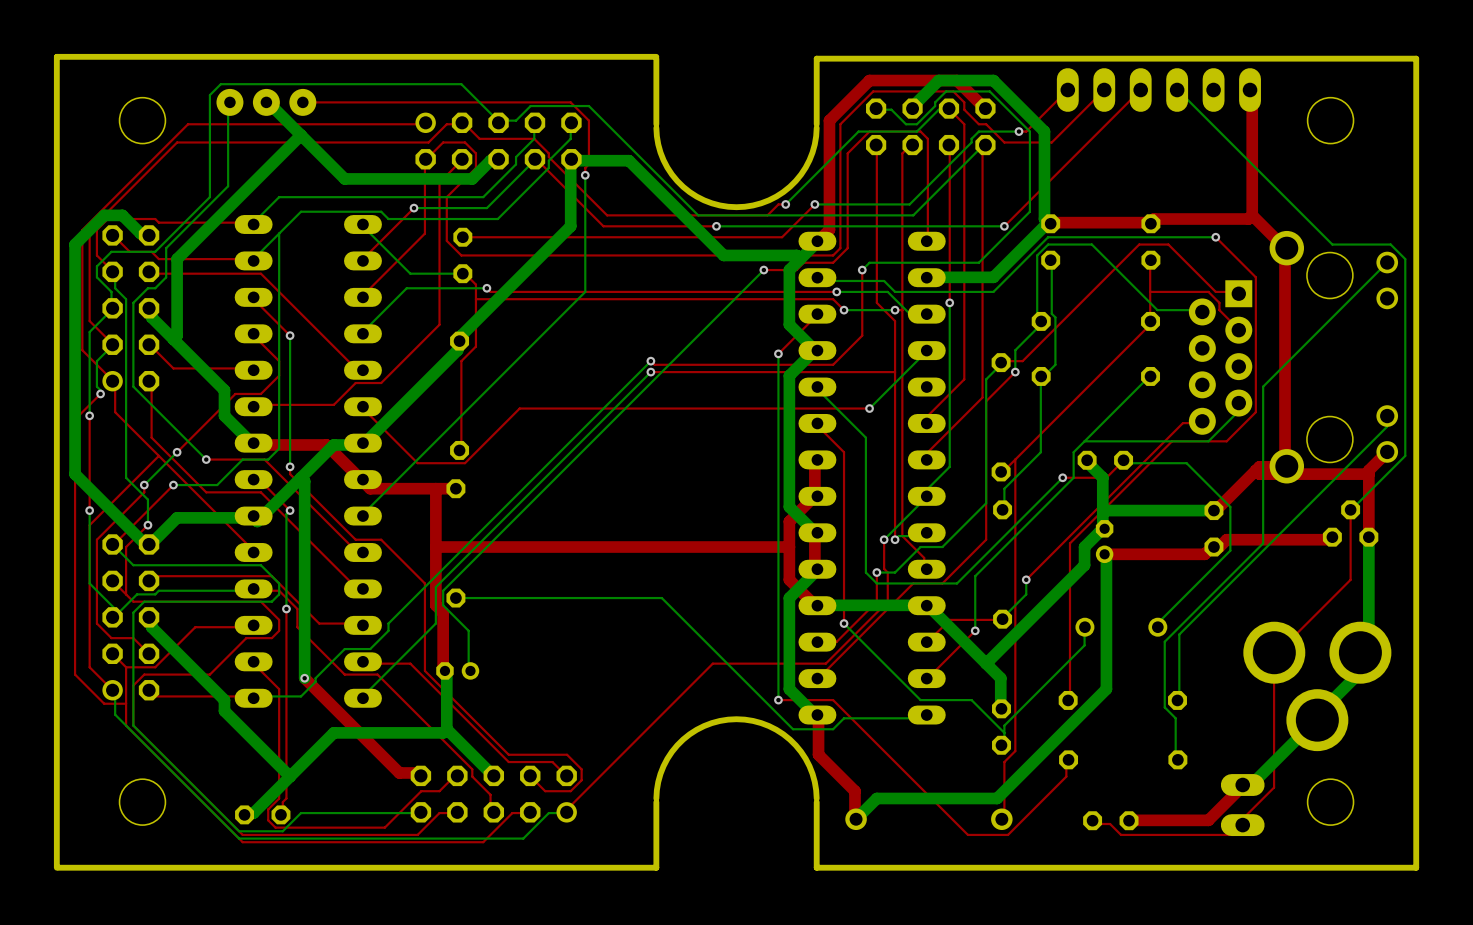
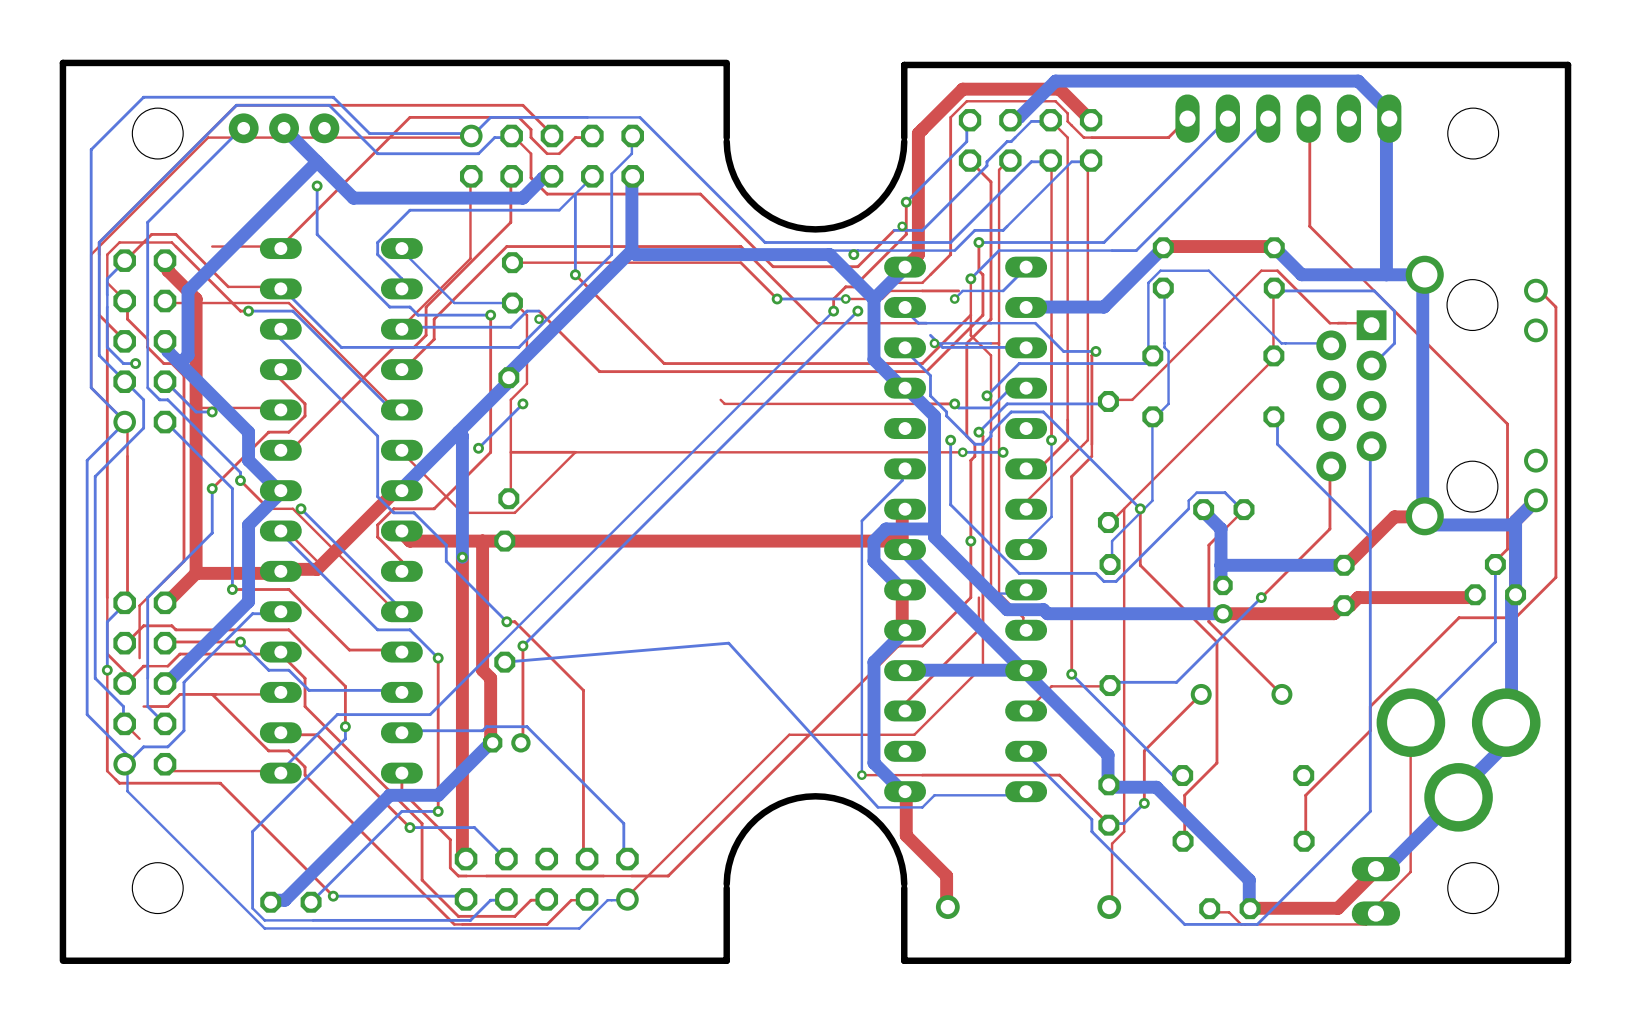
top track: (1067, 90) (1026, 131) (1018, 131) -> none
top track: (1104, 90) (1051, 142) (1004, 142) (986, 124) -> (1187, 118) (1168, 137) (1091, 137)
top track: (1140, 90) (1004, 226) -> none
part position: (1158, 90) -> (1288, 118)
bottom track: (1177, 90) (1332, 244) (1390, 244) (1405, 259) (1405, 455) (1350, 510) -> none
top track: (1250, 90) (1252, 91) (1252, 215) -> none
bottom track: (229, 102) (228, 102) (228, 186) (166, 248) (166, 277) (155, 288) (147, 288) (133, 302) -> (243, 128) (147, 222) (147, 335)
bottom track: (266, 102) (344, 178) -> (284, 128) (353, 198) (381, 198)
part position: (266, 102) -> (284, 128)
top track: (302, 102) (570, 102) (588, 120) (588, 164) (585, 168) (585, 175) -> none
bottom track: (530, 106) (516, 120) (501, 120) (498, 122) (461, 84) (220, 84) (209, 95) (209, 197) (155, 251) (111, 251) (96, 266) -> (587, 117) (490, 117) (471, 135) (470, 133) (369, 133) (333, 97) (143, 97) (91, 149) (91, 387) (124, 422) (87, 460) (87, 714) (131, 758) (124, 764) (127, 763) (143, 746) (167, 746) (183, 730) (183, 682) (252, 613) (280, 613) (280, 611)
bottom track: (578, 106) (588, 106) (698, 215) (913, 215) (982, 146) -> (639, 117) (765, 242) (950, 242) (1031, 161) (1050, 160)
top track: (858, 106) (840, 124) (840, 248) -> (950, 117) (950, 254) (930, 274)
bottom track: (913, 106) (938, 80) (993, 80) (1044, 131) (1044, 219) (1050, 223) (1048, 222) (993, 277) -> (1163, 247) (1103, 307) (1099, 307)
bottom track: none -> (1011, 117) (1019, 117) (1055, 81) (1358, 81) (1386, 109) (1386, 117) (1389, 118) (1386, 121) (1386, 274)
bottom track: none -> (1227, 118) (1103, 242) (978, 242)
bottom track: none -> (1268, 118) (1136, 250) (1112, 250)
top track: none -> (1308, 118) (1309, 226) (1346, 262)
bottom track: (876, 108) (891, 109) (905, 124) (916, 124) -> (970, 120) (966, 121) (966, 141) (906, 202)
bottom track: (931, 109) (935, 106) (935, 102) (946, 91) (989, 91) (1029, 131) (1029, 211) (978, 262) (905, 262) -> (1026, 267) (1003, 290)
bottom track: (938, 109) (916, 131) (858, 131) (785, 204) -> (1039, 121) (1031, 121)
bottom track: none -> (511, 135) (510, 137) (494, 137) (478, 153) (377, 153) (329, 105) (236, 105) (99, 242) (99, 355) (143, 399) (143, 428) (95, 476) (95, 678) (123, 706) (124, 723)
top track: (462, 122) (446, 124) (428, 142) (177, 142) (89, 229) -> (551, 135) (522, 105) (236, 105) (99, 242) (99, 254)
bottom track: (534, 122) (534, 138) (516, 157) (516, 164) (483, 197) (279, 197) (253, 224) -> none
bottom track: none -> (1015, 137) (1011, 141) (1007, 141) (986, 161) (986, 165) (922, 230) (894, 230)
bottom track: (1018, 131) (978, 131) (967, 146) -> (1087, 161) (1071, 161)
via: (1018, 131) -> none
bottom track: (301, 135) (177, 259) (177, 335) (173, 339) -> none
top track: none -> (531, 153) (531, 177) (547, 194) (700, 194) (773, 266) (857, 266) (894, 230)
top track: (494, 138) (479, 138) -> (547, 153) (531, 137) (531, 129) (518, 117) (409, 117) (280, 246)
top track: (505, 138) (534, 138) (548, 153) (548, 157) (607, 215) (767, 215) (778, 204) (785, 204) -> (559, 153) (575, 137) (591, 137) (592, 135)
bottom track: none -> (317, 161) (188, 290) (188, 355) (183, 359)
top track: (876, 146) (876, 251) -> (970, 161) (991, 181) (991, 319) (966, 343) (966, 436) (974, 444) (974, 456) (970, 460) (970, 597) (922, 646) (898, 646) (668, 876) (631, 876)
bottom track: (552, 157) (548, 160) (548, 168) (497, 219) (388, 219) (381, 211) (301, 211) (253, 259) -> (611, 173) (611, 254) (518, 347) (341, 347) (280, 286)
top track: (425, 159) (443, 142) (465, 142) (475, 153) (475, 168) (446, 197) (446, 240) (461, 255) (800, 255) -> none
top track: (534, 159) (603, 226) (716, 226) -> none
bottom track: (571, 159) (629, 160) (723, 255) (796, 255) (800, 259) -> none
top track: (461, 160) (439, 182) (439, 324) (381, 383) (355, 383) (333, 404) (264, 404) -> (510, 177) (510, 222) (426, 307) (426, 335) (413, 347) (393, 347) (292, 448)
bottom track: none -> (317, 186) (317, 234) (389, 307) (409, 307) (418, 315) (490, 315)
via: none -> (317, 186)
bottom track: none -> (575, 194) (575, 274)
bottom track: (585, 175) (585, 291) (362, 516) -> none
via: (585, 175) -> none
top track: none -> (906, 202) (906, 234) (853, 286) (845, 286) (833, 298) (833, 311)
via: none -> (906, 202)
bottom track: (505, 189) (486, 208) (414, 208) -> (559, 210) (409, 210) (377, 242) (377, 254) (401, 278) (401, 288)
via: (785, 204) -> none
top track: (814, 204) (782, 237) (669, 237) -> (777, 298) (740, 262)
bottom track: (909, 204) (814, 204) -> none
top track: (414, 208) (362, 260) -> none
via: (414, 208) -> none
top track: (1252, 215) (1286, 248) (1285, 251) (1285, 463) (1286, 466) -> none
top track: (1252, 215) (1248, 219) (1153, 219) (1150, 223) -> none
top track: none -> (978, 242) (978, 270) (982, 274) (982, 315) (926, 371) (599, 371) (539, 311)
via: none -> (978, 242)
top track: (191, 222) (158, 222) -> (248, 311) (240, 311) (175, 246)
bottom track: none -> (1274, 247) (1301, 274) (1424, 274) (1422, 278) (1422, 512) (1434, 524) (1515, 524)
bottom track: none -> (631, 250) (635, 254) (829, 254) (873, 298)
via: (716, 226) -> none
bottom track: (902, 226) (862, 226) -> (1007, 226) (1003, 230) (974, 230) (954, 250)
bottom track: none -> (999, 250) (970, 278)
via: (1004, 226) -> none
via: none -> (853, 254)
bottom track: (279, 233) (279, 448) (268, 459) (242, 459) (217, 485) (173, 485) -> none
bottom track: none -> (124, 260) (107, 278) (107, 294)
top track: (112, 235) (129, 251) (151, 251) (158, 259) (206, 259) -> (124, 260) (151, 234) (175, 234) (228, 286)
bottom track: (149, 235) (147, 233) (140, 233) (122, 215) (104, 215) (75, 244) (75, 474) (144, 543) (151, 543) (177, 517) (253, 517) (253, 516) (257, 521) (333, 444) (362, 444) (457, 350) (459, 341) -> (401, 490) (510, 379) (508, 377)
top track: none -> (165, 260) (167, 262) (167, 270) (196, 298) (196, 573)
bottom track: (1215, 237) (1048, 237) (993, 291) (935, 291) -> (1095, 351) (1063, 351) (1035, 323)
via: (1215, 237) -> none
top track: (926, 241) (927, 138) (920, 131) (869, 131) (847, 153) (847, 248) (833, 262) -> (958, 290) (922, 290)
top track: (1153, 244) (1168, 244) (1215, 291) -> (1277, 270) (1329, 323)
top track: none -> (575, 274) (664, 363) (922, 363) (970, 315)
via: none -> (575, 274)
via: none -> (970, 278)
bottom track: none -> (1274, 288) (1277, 290) (1374, 290) (1394, 311) (1394, 343) (1371, 365)
bottom track: (1387, 262) (1263, 386) (1263, 543) (1164, 641) (1164, 707) (1175, 718) (1175, 758) (1177, 759) -> none
top track: none -> (1535, 290) (1539, 290) (1555, 307) (1555, 577) (1515, 617) (1459, 617) (1370, 706) (1370, 730) (1305, 795) (1305, 839) (1304, 841)
via: none -> (777, 298)
bottom track: (763, 270) (752, 280) -> none
bottom track: none -> (849, 298) (777, 298)
top track: (862, 270) (862, 335) (833, 364) -> (954, 403) (922, 403)
bottom track: (112, 271) (115, 273) (115, 288) (126, 299) (126, 477) (147, 499) (147, 525) -> none
top track: none -> (124, 301) (127, 303) (127, 319) (147, 339) (147, 347) (163, 363) (171, 363) (183, 375) (183, 561) (163, 581)
bottom track: (96, 277) (111, 291) (112, 308) (89, 332) (89, 415) -> (107, 307) (107, 347) (123, 363) (135, 363)
top track: (1255, 277) (1255, 412) (1226, 441) (1172, 441) (1069, 543) (1069, 700) (1068, 700) -> (1390, 307) (1507, 424) (1507, 549) (1495, 561) (1495, 564)
bottom track: none -> (248, 311) (292, 311) (389, 407) (401, 407) (401, 409)
via: none -> (248, 311)
bottom track: none -> (539, 311) (526, 311) (510, 327) (401, 327) (401, 329)
via: none -> (833, 311)
bottom track: none -> (857, 311) (522, 646)
via: none -> (857, 311)
bottom track: (818, 280) (884, 280) (895, 291) -> (906, 311) (918, 323) (926, 323)
top track: (89, 284) (89, 321) (112, 344) -> (99, 315) (124, 341)
top track: none -> (490, 315) (490, 452) (434, 508) (393, 508) (377, 524) (377, 537) (401, 561) (401, 571)
via: none -> (490, 315)
bottom track: (486, 288) (406, 288) (362, 333) -> none
top track: (486, 288) (490, 291) (738, 291) -> (401, 369) (401, 371) (434, 339) (434, 319) (506, 246) (740, 246) (817, 323)
via: (836, 291) -> none
bottom track: (887, 291) (909, 313) -> (982, 323) (991, 323)
top track: (1201, 291) (1150, 291) -> none
top track: (1208, 291) (1219, 302) (1219, 310) (1238, 330) -> (1338, 323) (1346, 323)
bottom track: none -> (280, 329) (280, 339) (377, 436) (377, 496) (393, 512) (413, 512) (446, 545) (446, 561) (506, 621)
top track: (253, 297) (290, 335) -> none
top track: (475, 299) (833, 299) (844, 310) -> none
bottom track: none -> (930, 335) (942, 347) (1007, 347)
bottom track: (949, 302) (949, 397) -> none
top track: none -> (1051, 335) (1051, 440)
via: (949, 302) -> none
via: (895, 310) -> none
bottom track: none -> (905, 347) (906, 351) (930, 375) (930, 395) (946, 411) (946, 416) (974, 444) (982, 444) (991, 436) (991, 432) (1011, 411) (1043, 411) (1140, 508)
top track: (817, 314) (778, 353) -> none
via: none -> (1095, 351)
via: none -> (135, 363)
bottom track: (1037, 328) (1015, 350) (1015, 372) -> (1148, 363) (1019, 363) (986, 395)
top track: (253, 335) (279, 361) (279, 375) (260, 393) (235, 393) (177, 452) -> (280, 371) (280, 379) (305, 403) (305, 416) (288, 432) (268, 432) (212, 488)
bottom track: (290, 335) (290, 466) -> none
via: (290, 335) -> none
bottom track: (112, 344) (96, 361) (96, 386) (100, 390) (100, 393) -> none
bottom track: none -> (165, 381) (196, 411) (212, 411)
bottom track: (133, 350) (133, 386) (206, 459) -> (147, 387) (159, 399) (167, 399) (240, 472) (240, 480)
bottom track: (817, 350) (811, 353) (789, 375) (789, 488) -> (934, 528) (886, 528) (873, 541)
bottom track: (778, 353) (778, 470) -> (905, 468) (902, 472) (902, 480) (861, 520)
via: (778, 353) -> none
bottom track: (924, 353) (869, 408) -> (1023, 391) (1007, 391) (991, 407) (958, 407) (954, 403)
via: none -> (986, 395)
bottom track: (650, 361) (388, 623) (388, 630) (370, 649) (344, 649) (315, 678) (315, 681) (301, 696) (253, 696) -> none
via: (650, 361) -> none
bottom track: none -> (522, 403) (478, 448)
via: none -> (522, 403)
via: none -> (954, 403)
bottom track: (1000, 364) (986, 379) (986, 503) (942, 547) (920, 547) (895, 572) (876, 572) -> (1108, 403) (1007, 403) (978, 432)
via: none -> (212, 411)
bottom track: (650, 372) (435, 587) (435, 623) (362, 698) -> none
via: (650, 372) -> none
top track: (895, 372) (650, 372) -> none
top track: (1015, 372) (986, 401) -> (1095, 351) (1091, 355) (1091, 444)
via: (1015, 372) -> none
bottom track: (1150, 376) (1080, 444) -> (1244, 509) (1225, 492) (1196, 492)
bottom track: none -> (1273, 416) (1277, 420) (1277, 444) (1370, 537)
top track: (964, 379) (927, 415) (927, 423) -> (1067, 420) (1067, 440) (1039, 468) (1027, 468)
bottom track: none -> (165, 422) (232, 488) (232, 589)
top track: (149, 381) (151, 383) (151, 437) (206, 492) (260, 492) (355, 587) -> (232, 589) (288, 589) (349, 650) (393, 650)
bottom track: (817, 387) (865, 437) (865, 572) (876, 583) (957, 583) (1062, 477) -> none
bottom track: none -> (458, 432) (462, 436) (462, 557)
via: none -> (978, 432)
top track: (100, 393) (75, 419) (75, 674) (96, 696) -> none
via: (100, 393) -> none
via: none -> (950, 440)
via: none -> (1051, 440)
via: none -> (478, 448)
top track: none -> (575, 452) (510, 452)
bottom track: none -> (1003, 452) (962, 452)
via: none -> (1003, 452)
top track: (115, 412) (253, 552) -> none
top track: (986, 412) (986, 539) (942, 583) (913, 583) (818, 678) -> (1091, 456) (1071, 476) (1071, 674)
bottom track: (1237, 412) (1208, 441) (1084, 441) -> (1370, 456) (1370, 811) (1257, 924) (1184, 924) (1091, 831) (1091, 819) (1027, 754) (1026, 751)
top track: (89, 415) (89, 510) -> none
via: (89, 415) -> none
bottom track: (1387, 416) (1387, 426) (1179, 634) (1179, 700) (1177, 700) -> none
top track: (817, 423) (844, 452) (844, 623) -> none
top track: (1201, 423) (1182, 423) (1026, 579) -> (1329, 468) (1329, 528) (1261, 597)
via: none -> (240, 480)
bottom track: none -> (212, 488) (212, 533) (147, 597) (147, 678)
via: none -> (212, 488)
top track: (253, 443) (253, 444) (326, 444) (362, 479) -> none
top track: none -> (401, 490) (401, 492) (393, 492) (317, 569) (284, 569) (280, 573) (196, 573)
bottom track: (177, 452) (144, 485) -> none
via: (177, 452) -> none
top track: (158, 455) (89, 525) (89, 667) (112, 690) -> none
via: (206, 459) -> none
top track: (242, 459) (206, 459) -> (268, 508) (240, 480)
bottom track: none -> (301, 508) (401, 611)
via: none -> (301, 508)
top track: none -> (1140, 508) (1140, 565) (1216, 641) (1216, 763) (1184, 795) (1184, 839) (1183, 841)
via: none -> (1140, 508)
bottom track: (1073, 459) (1073, 477) (975, 576) (975, 630) -> (1188, 508) (1116, 581) (1103, 581) (1095, 573) (1019, 573) (950, 504) (950, 440)
bottom track: (1123, 460) (1124, 463) (1186, 463) (1230, 506) (1230, 550) (1161, 619) (1161, 627) (1157, 627) -> none
top track: (290, 466) (290, 474) (355, 539) (381, 539) (424, 583) (424, 670) (508, 754) (567, 754) (581, 769) (581, 780) (570, 791) -> none
via: (290, 466) -> none
top track: (1255, 470) (1259, 474) (1368, 474) -> none
bottom track: (301, 477) (304, 481) (304, 678) -> none
via: (1062, 477) -> none
top track: (1106, 477) (1062, 477) -> (1225, 528) (1208, 545) (1208, 621) (1281, 694)
bottom track: none -> (280, 531) (377, 629) (409, 629) (438, 658)
top track: (144, 485) (144, 492) (96, 539) -> (107, 323) (107, 597)
via: (144, 485) -> none
top track: (173, 485) (115, 543) -> (127, 456) (127, 601)
via: (173, 485) -> none
via: none -> (970, 541)
top track: (817, 496) (811, 499) (789, 521) (789, 579) (817, 605) -> (905, 549) (898, 541) (504, 541)
bottom track: (926, 496) (884, 539) -> none
via: none -> (462, 557)
bottom track: none -> (1495, 564) (1495, 641) (1414, 722) (1410, 722)
top track: (1350, 509) (1350, 579) (1277, 652) (1274, 652) -> none
bottom track: (89, 510) (89, 583) (118, 612) (112, 617) (115, 616) (137, 594) (155, 594) (158, 590) (253, 590) (253, 588) -> none
via: (89, 510) -> none
bottom track: (290, 510) (286, 514) (286, 608) -> none
via: (290, 510) -> none
top track: none -> (196, 573) (165, 602)
via: (147, 525) -> none
bottom track: (1104, 528) (1084, 547) (1084, 565) (986, 663) -> none
via: none -> (232, 589)
bottom track: (1368, 537) (1368, 641) (1360, 652) -> (1535, 500) (1515, 520) (1515, 594) (1511, 597) (1511, 722) (1506, 722)
via: (884, 539) -> none
via: (895, 539) -> none
via: none -> (1261, 597)
bottom track: (112, 544) (133, 565) (260, 565) (279, 583) (279, 594) (271, 601) (144, 601) (133, 612) -> (124, 602) (107, 621) (107, 670)
top track: (789, 547) (435, 547) -> none
bottom track: (1104, 554) (1106, 554) (1106, 689) (997, 798) (876, 798) (856, 819) -> (1223, 613) (1047, 613) (1043, 609) (1007, 609) (934, 537) (934, 416) (905, 388)
via: none -> (506, 621)
top track: (876, 572) (876, 601) (836, 641) (818, 641) -> (978, 432) (982, 436) (982, 625) (906, 702) (906, 710)
via: (876, 572) -> none
top track: (151, 579) (155, 576) (271, 576) (319, 623) (362, 623) (362, 625) -> (167, 641) (240, 641)
bottom track: none -> (240, 641) (268, 670) (288, 670) (309, 690) (401, 690) (401, 692)
via: none -> (240, 641)
bottom track: (1026, 579) (1026, 594) (1004, 616) -> (1261, 597) (1176, 682) (1112, 682)
via: (1026, 579) -> none
top track: (112, 580) (133, 601) -> (107, 654) (131, 678) (124, 683) (127, 682) (143, 666) (147, 666)
top track: none -> (124, 643) (143, 625) (171, 625) (175, 629) (288, 629) (345, 686) (345, 726)
top track: none -> (522, 646) (522, 742) (520, 742)
via: none -> (522, 646)
top track: (96, 590) (96, 605) -> none
top track: (253, 590) (279, 590) (297, 608) (297, 627) (344, 674) (377, 674) (472, 769) (472, 776) (490, 794) (490, 809) (493, 812) -> (167, 666) (179, 654) (280, 654) (305, 678) (305, 706) (422, 823) (422, 880) (458, 916) (514, 916) (531, 900) (546, 899)
bottom track: (443, 590) (443, 605) (468, 630) (468, 670) (470, 670) -> (490, 654) (430, 714) (337, 714) (280, 771)
top track: none -> (438, 658) (438, 811)
via: none -> (438, 658)
bottom track: (455, 598) (661, 598) (793, 729) -> (504, 662) (728, 643) (878, 807)
top track: (151, 601) (260, 601) (279, 619) (279, 630) (271, 638) (246, 638) (209, 674) (144, 674) (133, 685) (133, 725) (242, 834) (410, 834) -> (212, 694) (268, 750) (288, 750) (305, 767) (305, 775) (454, 924)
via: none -> (107, 670)
bottom track: (926, 605) (1000, 678) (1000, 681) -> (905, 549) (906, 553) (1019, 666) (1026, 670) (1027, 674) (1108, 754)
top track: (286, 608) (286, 798) (282, 802) (282, 813) (280, 814) -> none
via: (286, 608) -> none
bottom track: none -> (1071, 674) (1172, 775) (1182, 775)
via: none -> (1071, 674)
bottom track: (149, 617) (151, 619) (151, 627) (224, 700) (224, 711) (290, 776) -> (165, 683) (248, 601) (248, 524) (276, 496) (280, 490) (276, 488)
top track: (96, 623) (111, 638) (129, 638) -> (107, 690) (107, 771)
bottom track: (844, 623) (920, 700) (971, 700) (1004, 732) -> none
via: (844, 623) -> none
top track: (195, 627) (155, 667) (126, 667) (126, 725) (242, 842) (483, 842) (512, 813) (516, 813) -> none
bottom track: (1084, 627) (1084, 645) (1004, 725) (1004, 743) -> (1144, 803) (1124, 823) (1112, 823)
top track: none -> (1201, 694) (1144, 750) (1144, 803)
top track: (975, 630) (926, 678) -> none
via: (975, 630) -> none
bottom track: (133, 638) (133, 725) (228, 820) -> (345, 726) (345, 738) (252, 831) (252, 908)
bottom track: none -> (147, 706) (165, 723)
top track: (133, 638) (149, 653) -> (147, 706) (167, 706) (179, 694) (216, 694)
via: none -> (345, 726)
bottom track: none -> (401, 732) (401, 730) (482, 730) (486, 726) (526, 726) (623, 823) (623, 855) (627, 859)
top track: (362, 661) (362, 663) (410, 663) (508, 762) (552, 762) (566, 775) -> none
top track: (253, 663) (279, 689) (279, 798) (268, 809) (268, 820) (275, 827) (384, 827) (421, 791) -> (280, 734) (317, 734) (409, 827)
bottom track: (444, 670) (446, 670) (446, 729) -> (492, 742) (438, 795) (389, 795) (284, 900) (280, 900)
top track: (304, 678) (399, 772) (417, 772) -> (462, 557) (462, 855)
via: (304, 678) -> none
top track: none -> (401, 773) (401, 791) (450, 839) (450, 867) (458, 876) (466, 876)
top track: (833, 700) (967, 834) (1008, 834) (1066, 776) (1066, 762) (1068, 759) -> (922, 775) (1059, 775) (1108, 825)
top track: (126, 703) (104, 703) -> (333, 896) (220, 783) (119, 783) (115, 779)
bottom track: none -> (1108, 784) (1112, 787) (1156, 787) (1249, 880) (1250, 908)
via: none -> (1144, 803)
bottom track: (446, 729) (493, 775) -> none
bottom track: (446, 729) (443, 732) (395, 732) -> none
bottom track: (362, 732) (333, 732) (253, 813) -> (401, 811) (311, 902)
bottom track width: thick (395, 732) (362, 732) -> thin (438, 811) (401, 811)
via: none -> (438, 811)
bottom track: none -> (409, 827) (474, 827) (506, 859)
via: none -> (409, 827)
top track: (457, 775) (454, 776) (439, 791) -> (603, 876) (486, 876)
top track: (530, 775) (545, 791) -> (587, 859) (583, 855) (583, 690) (514, 621) (506, 621)
via: none -> (333, 896)
bottom track: (420, 812) (301, 813) (282, 831) -> (466, 899) (462, 896) (333, 896)
bottom track: none -> (506, 899) (490, 900) (470, 920) (313, 920)
top track: (457, 812) (439, 813) (417, 834) -> (571, 900) (547, 924) (462, 924)

